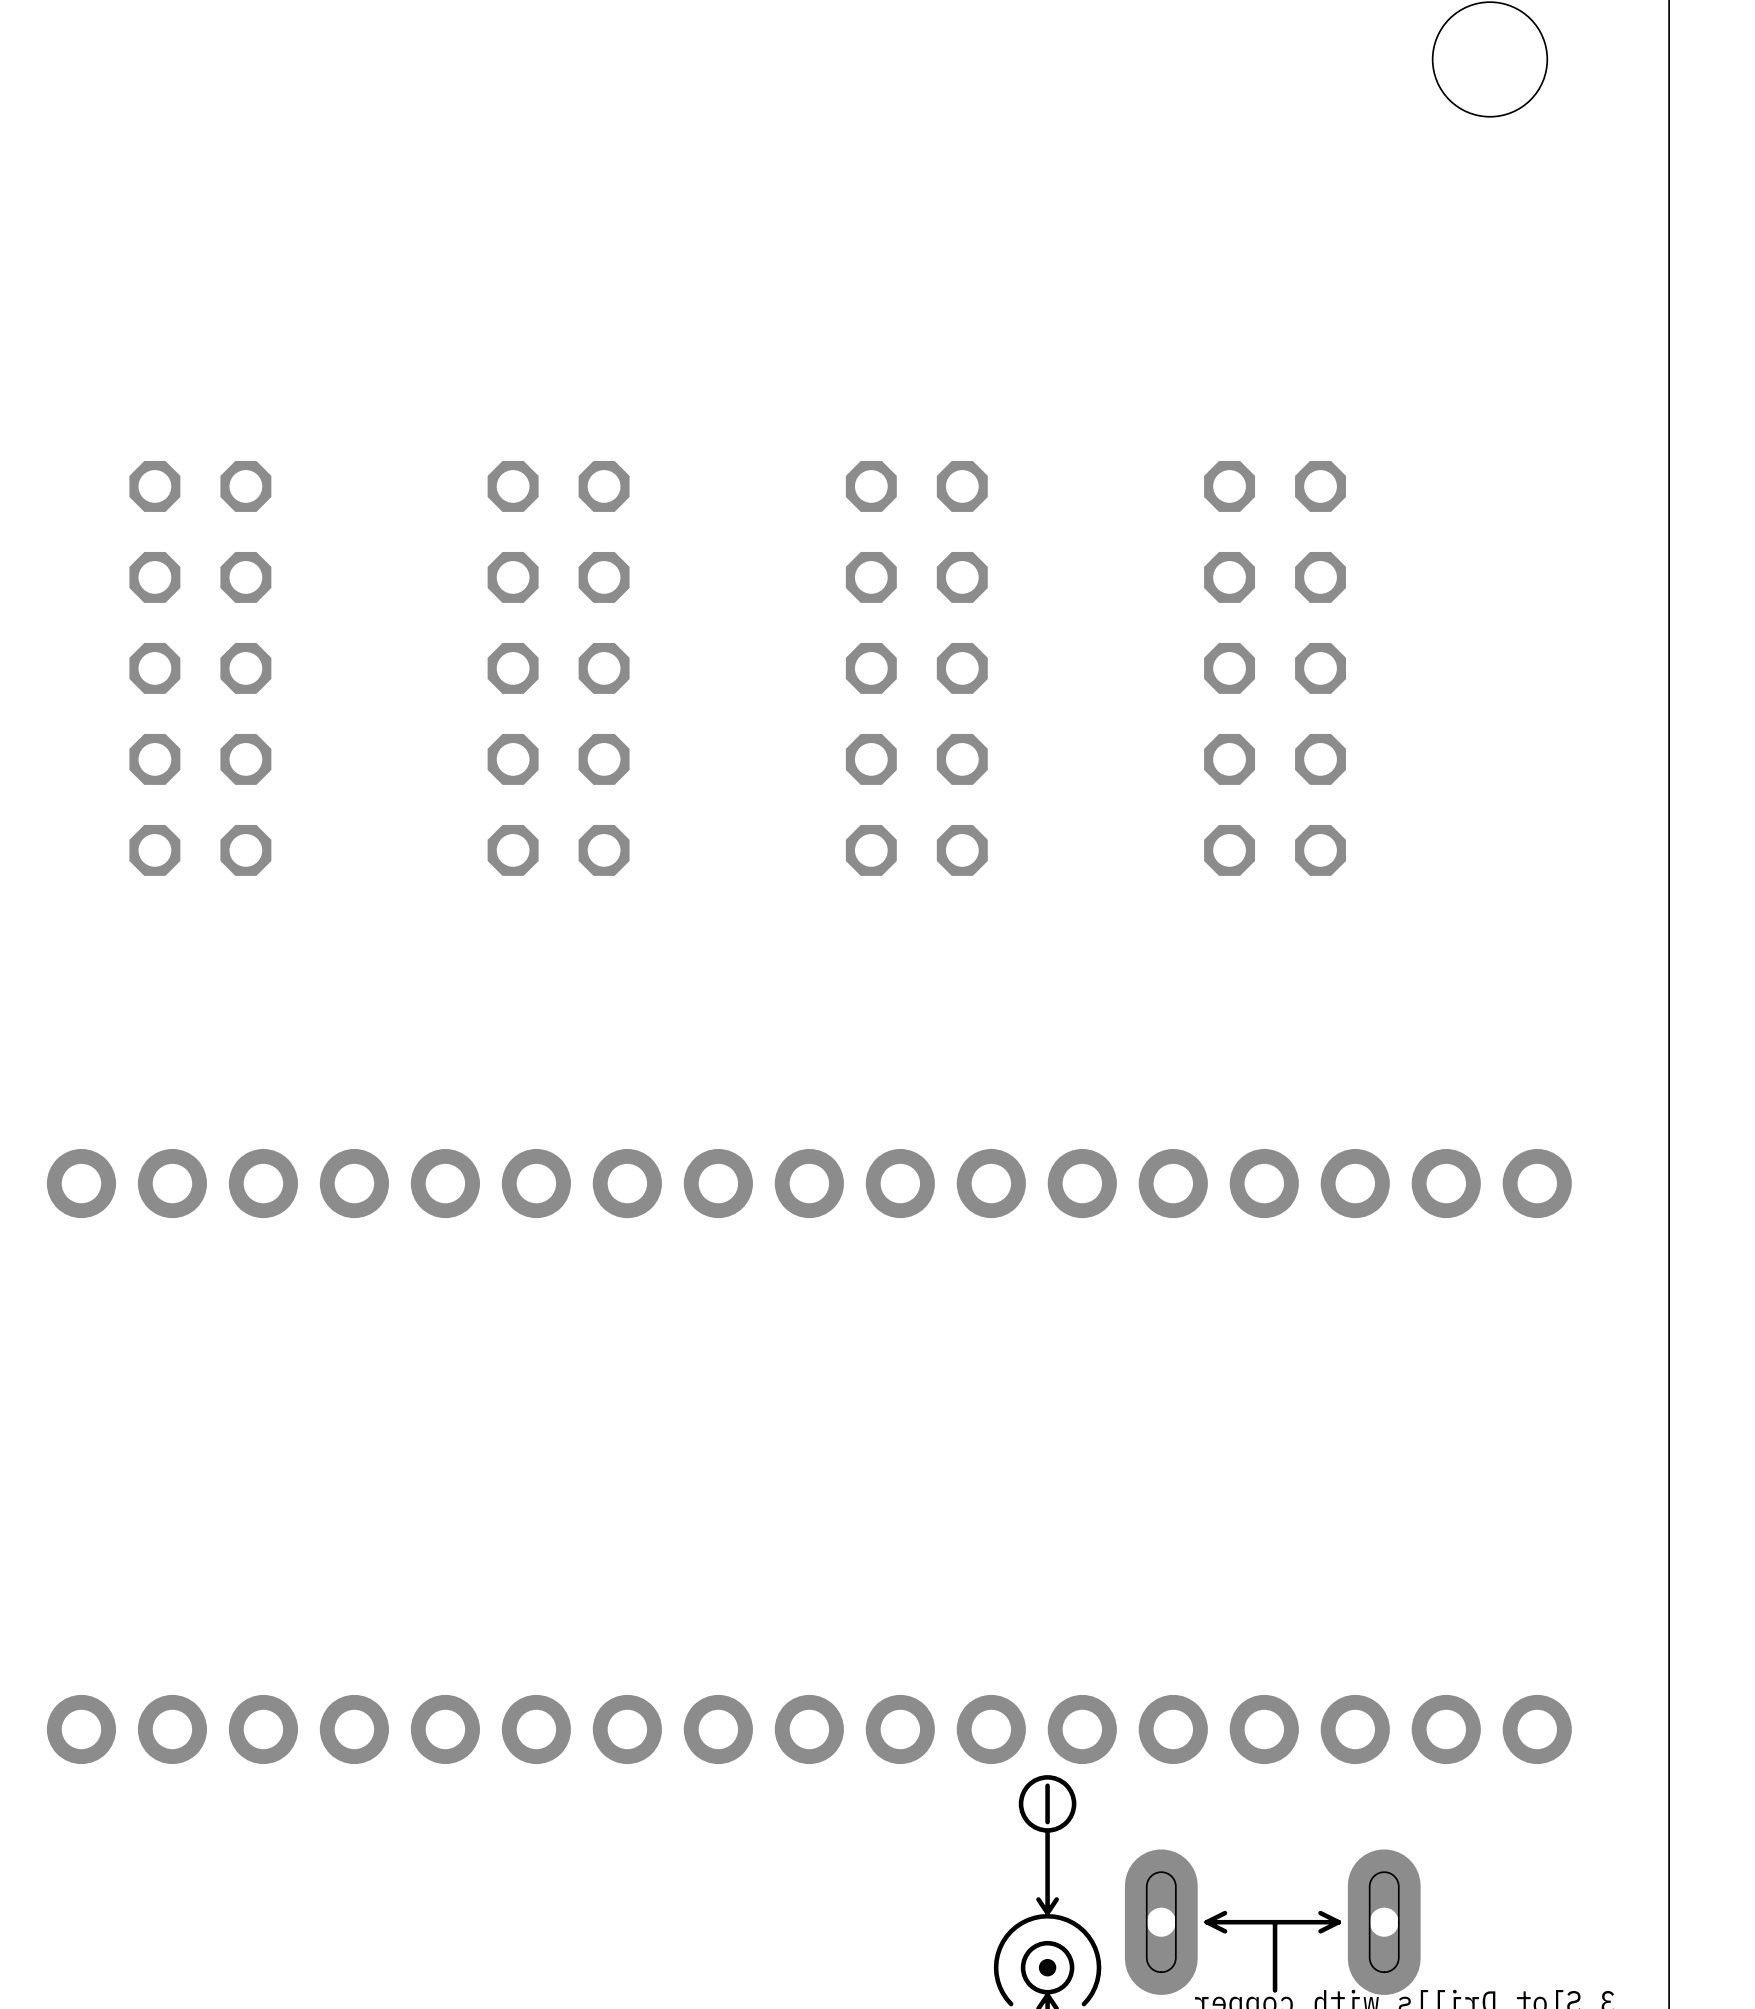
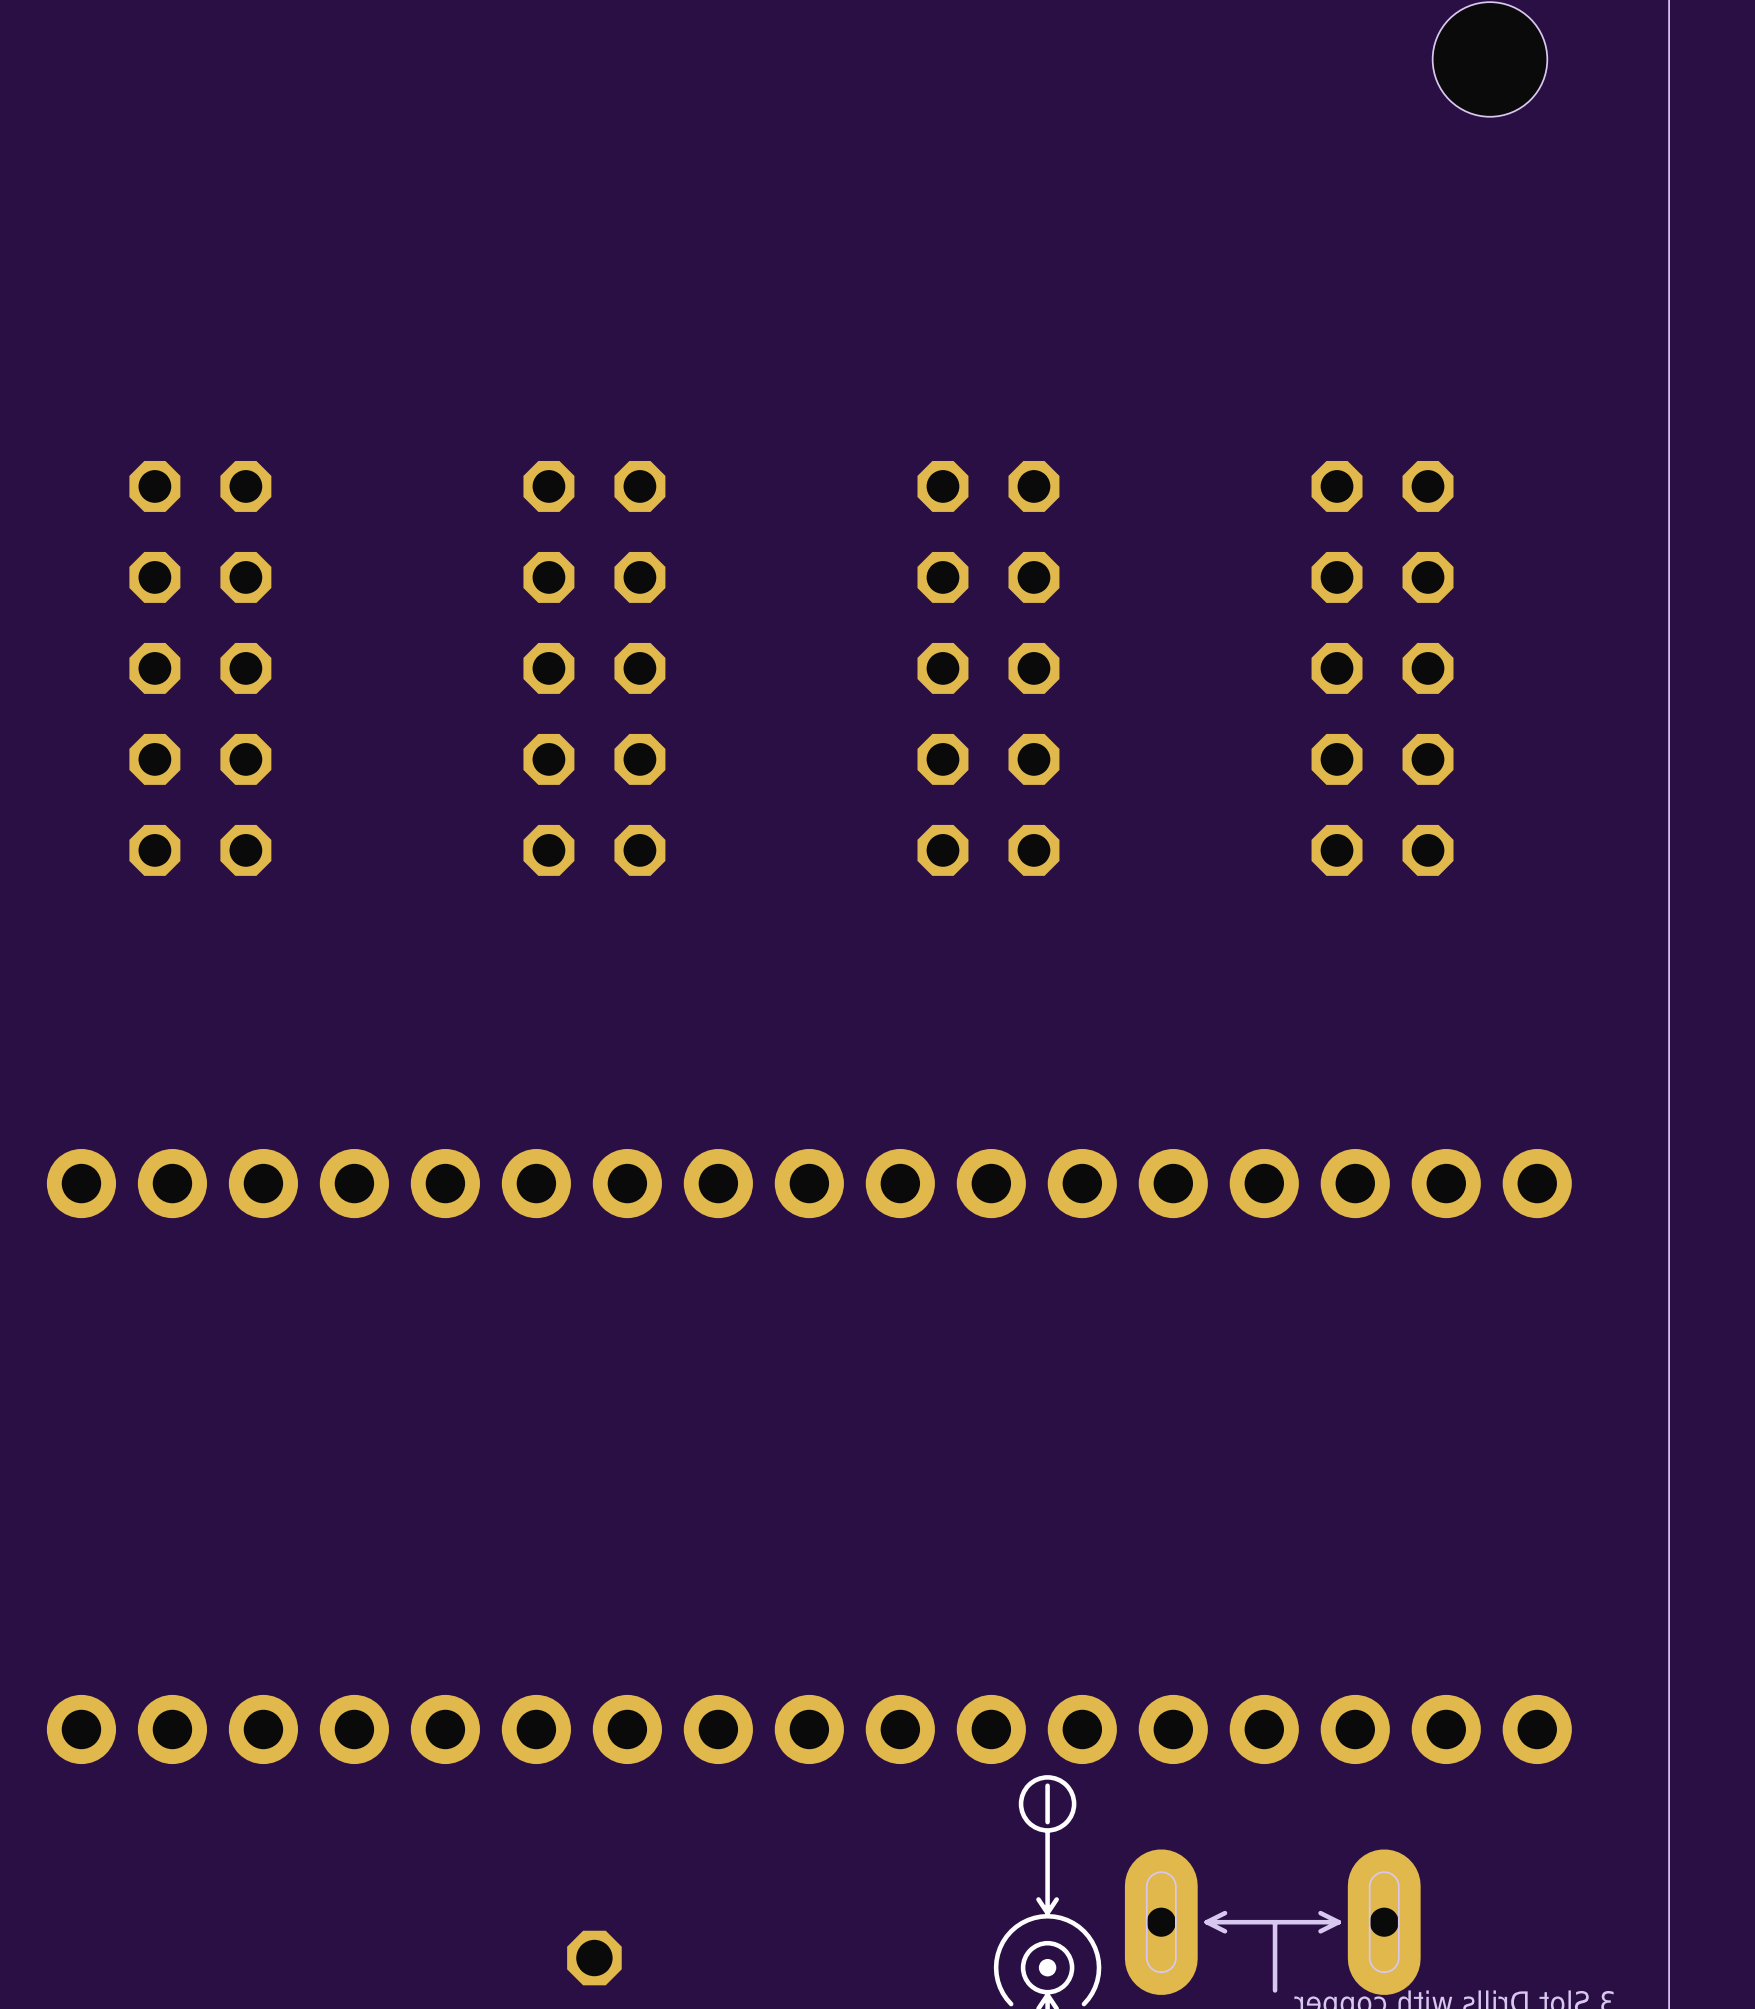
part position: (558, 668) -> (594, 668)
part position: (916, 668) -> (988, 668)
part position: (1275, 668) -> (1382, 668)
part: none -> (594, 1958)

